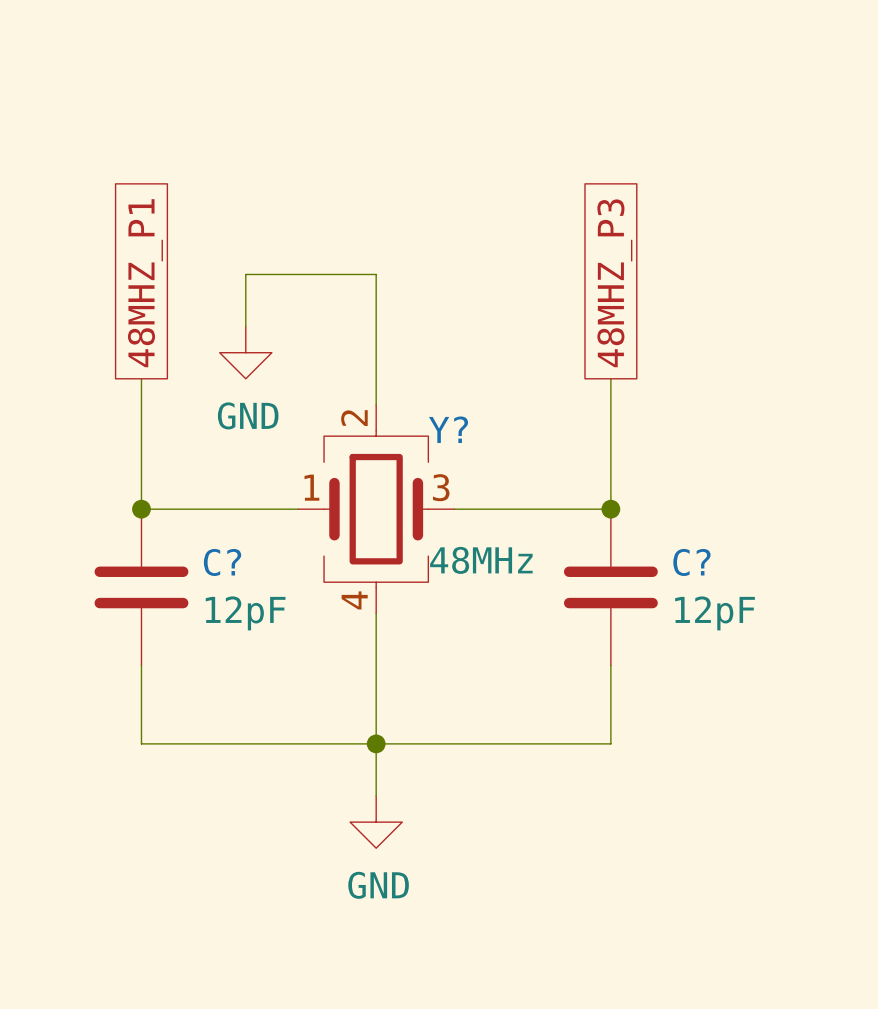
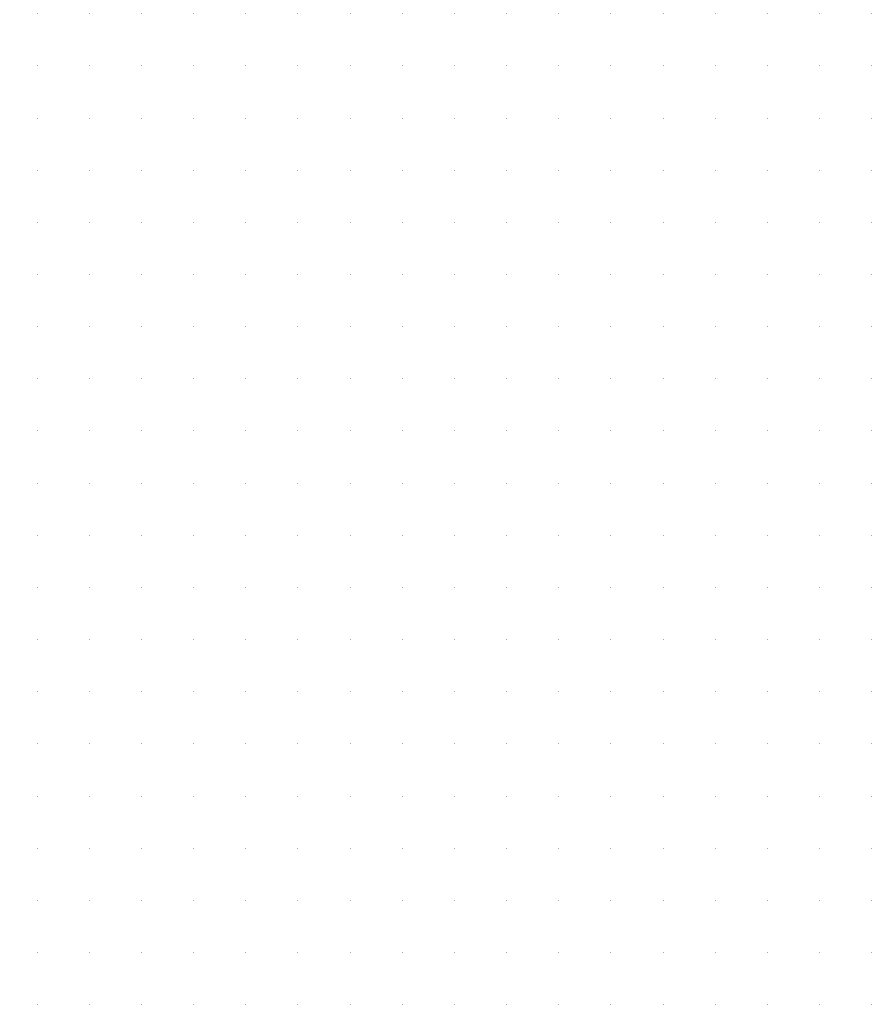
global label: 48MHZ_P1 (145, 283) -> none
global label: 48MHZ_P3 (614, 283) -> none
wire: (245, 326) (245, 274) (376, 274) (376, 404) -> none
power symbol: GND (245, 352) -> none
wire: (141, 378) (141, 509) (297, 509) -> none
wire: (610, 378) (610, 509) (454, 509) -> none
junction: (141, 509) -> none
Y?: 48MHz (376, 509) -> none
junction: (610, 509) -> none
C?: 12pF (141, 587) -> none
C?: 12pF (610, 587) -> none
wire: (376, 613) (376, 796) -> none
wire: (141, 665) (141, 743) (610, 743) (610, 665) -> none
junction: (376, 743) -> none
power symbol: GND (376, 822) -> none

